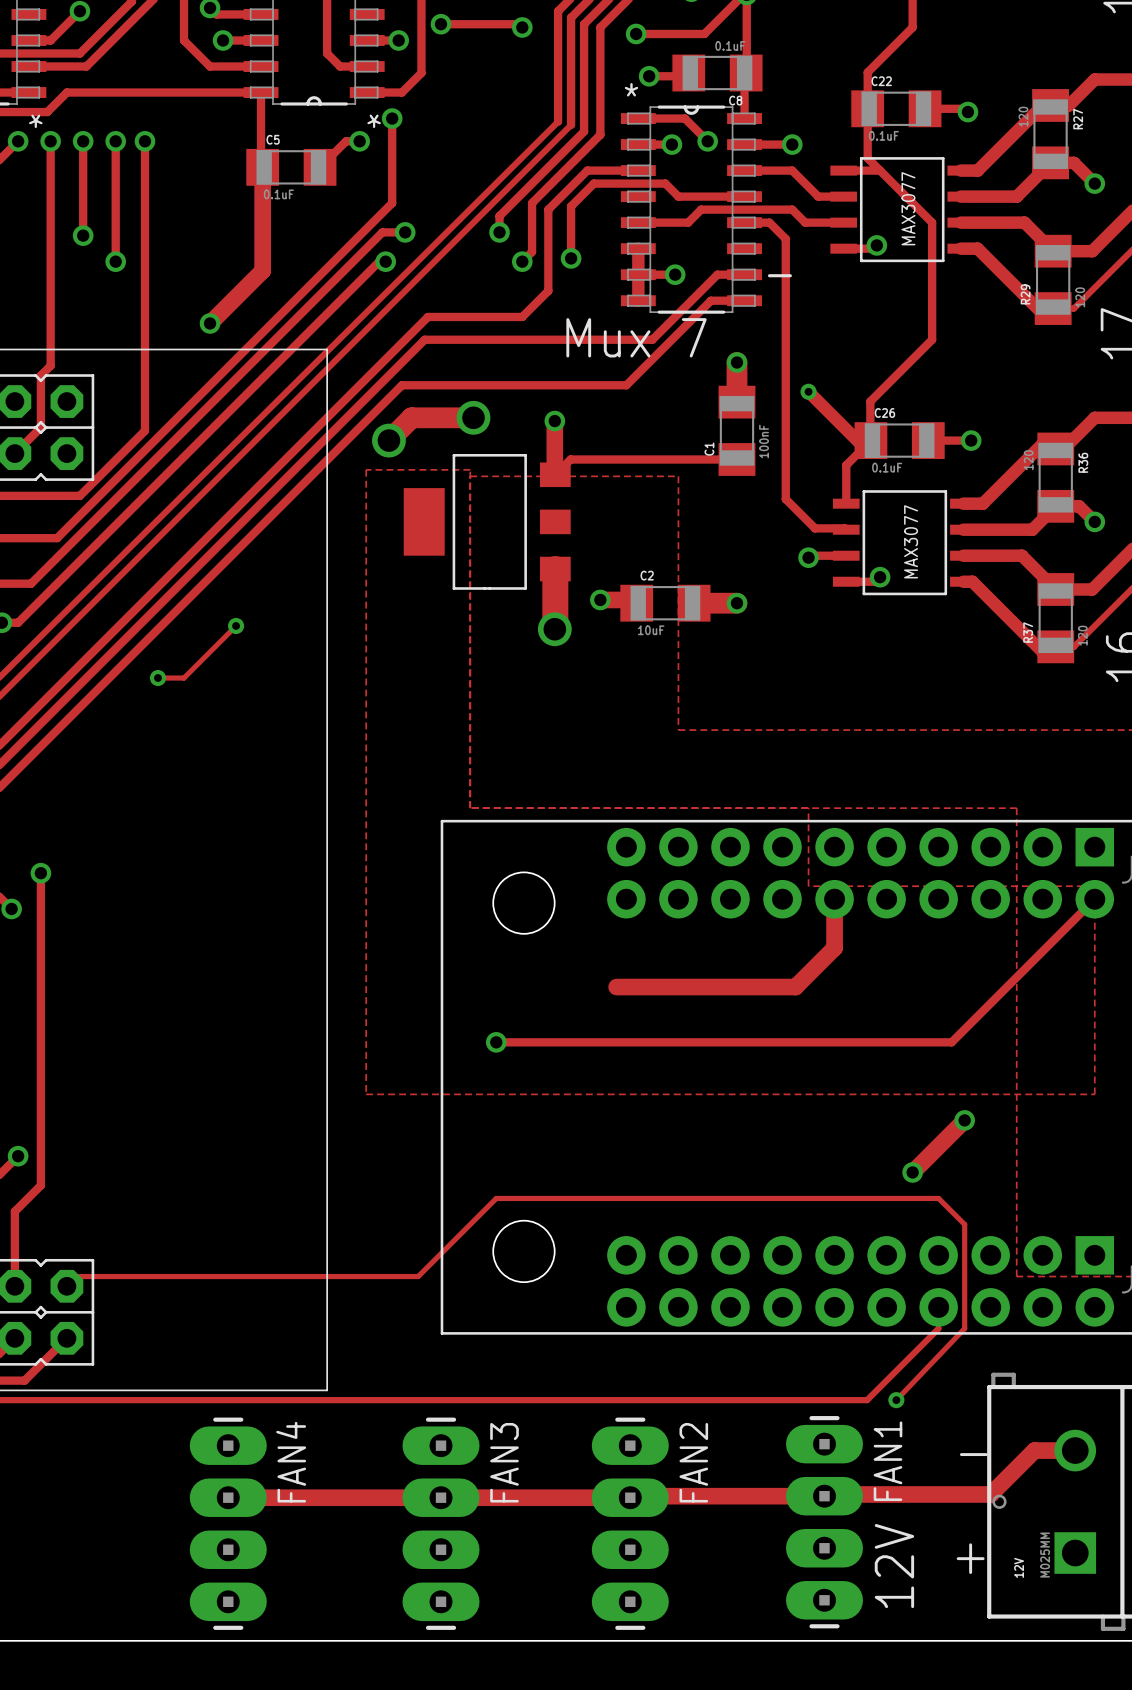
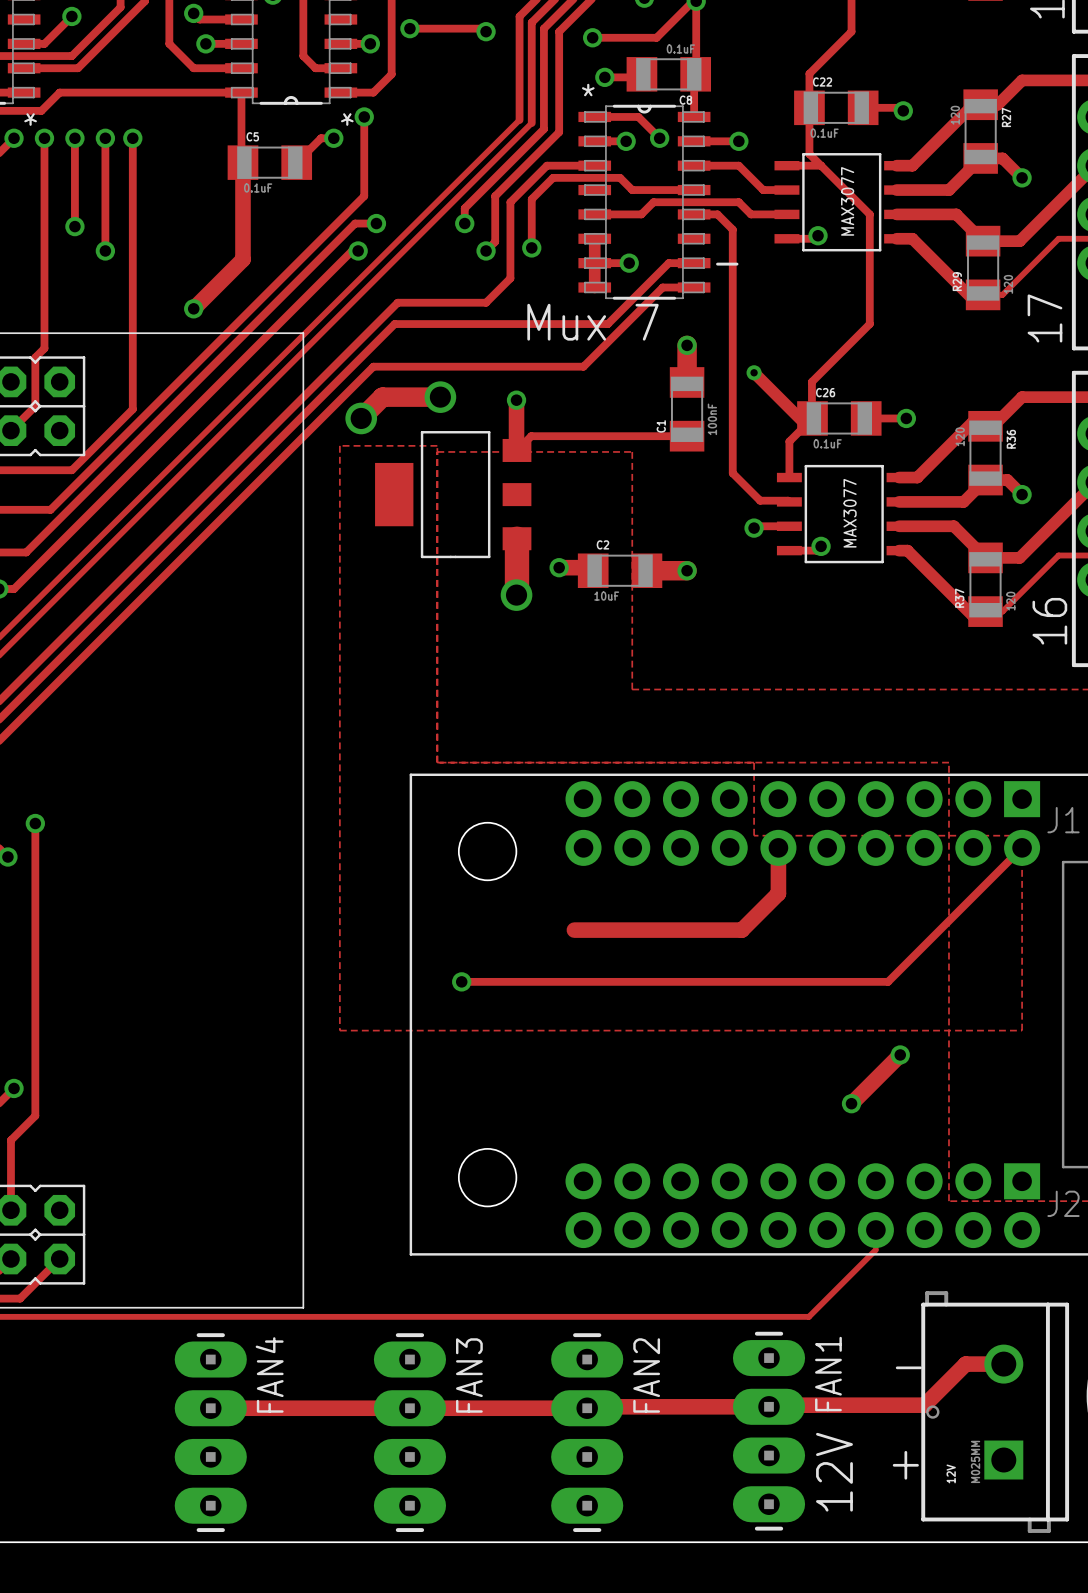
track: (236, 625) (184, 678) (157, 678) -> none
via: (236, 625) -> none
via: (157, 678) -> none
track: (66, 1286) (79, 1276) (418, 1276) (496, 1198) (938, 1198) (964, 1224) (964, 1328) (896, 1400) -> none
via: (896, 1400) -> none

